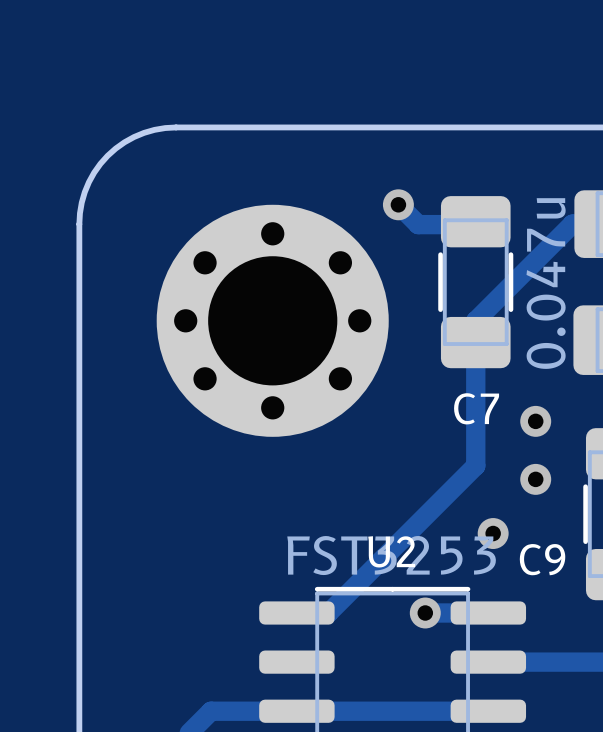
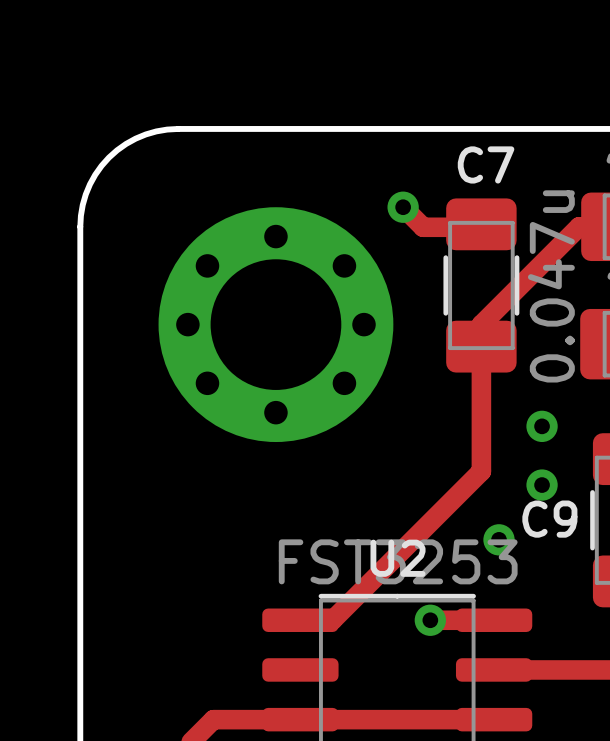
C7 name position: C7 (476, 408) -> C7 (486, 164)
C9 name position: C9 (542, 559) -> C9 (549, 519)

